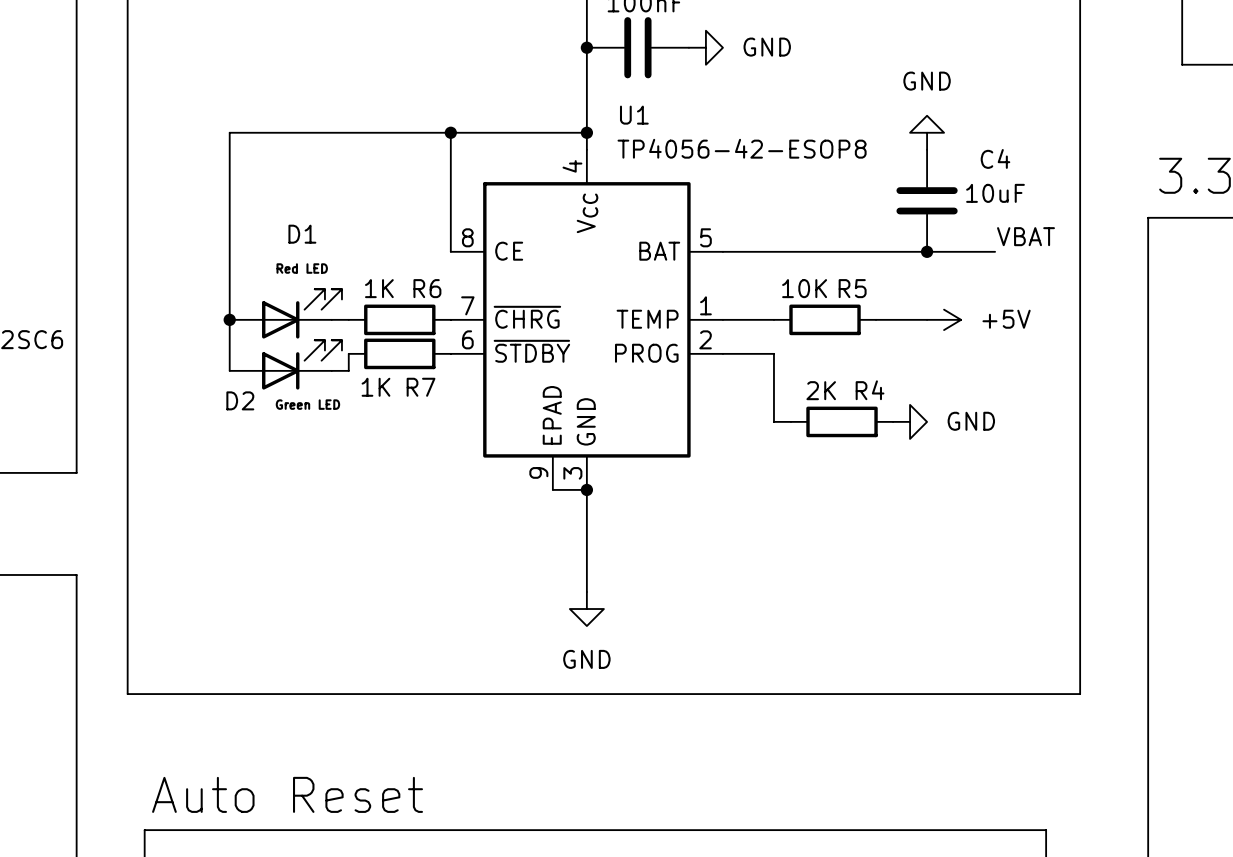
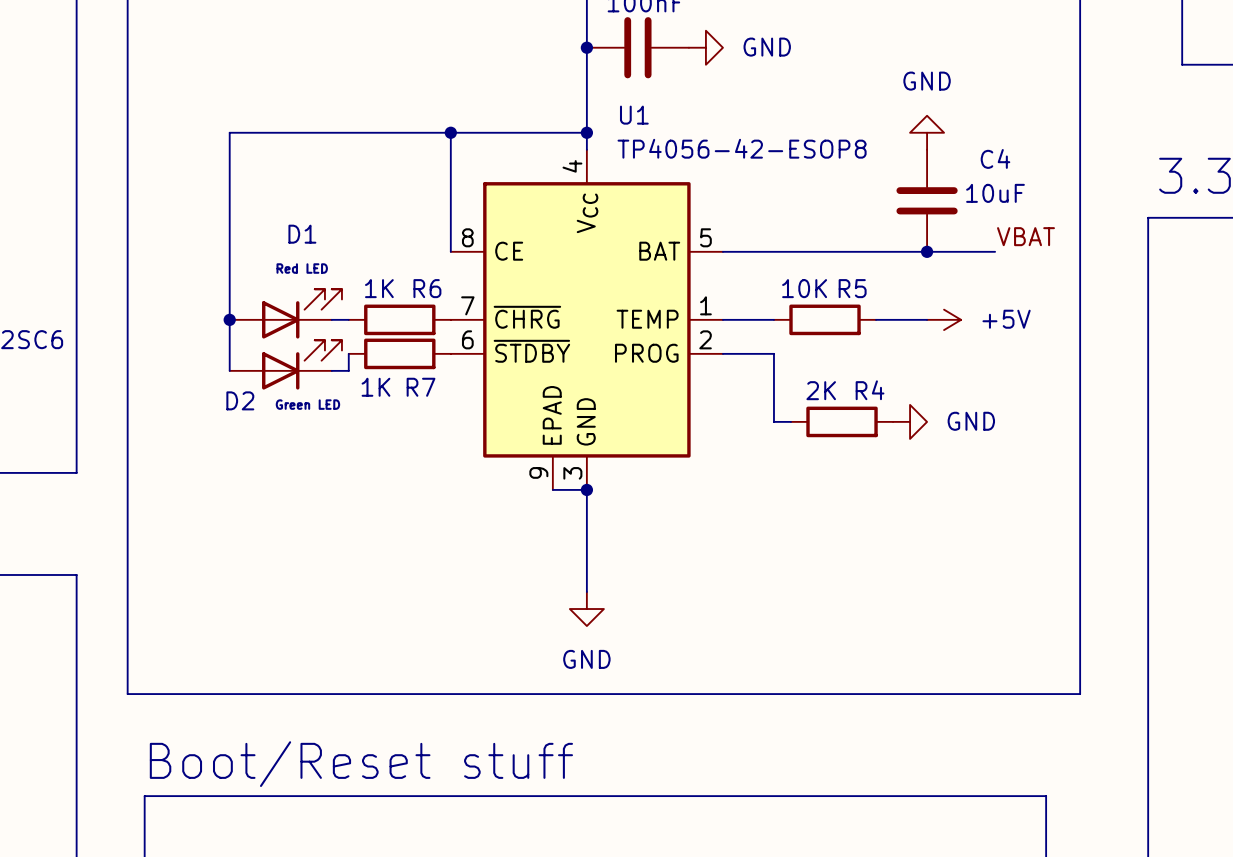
text: none -> Boot/Reset stuff (361, 764)
text: Auto Reset (287, 794) -> none
line: (144, 830) (1046, 830) -> (144, 830) (144, 796) (1046, 796) (1046, 830)

